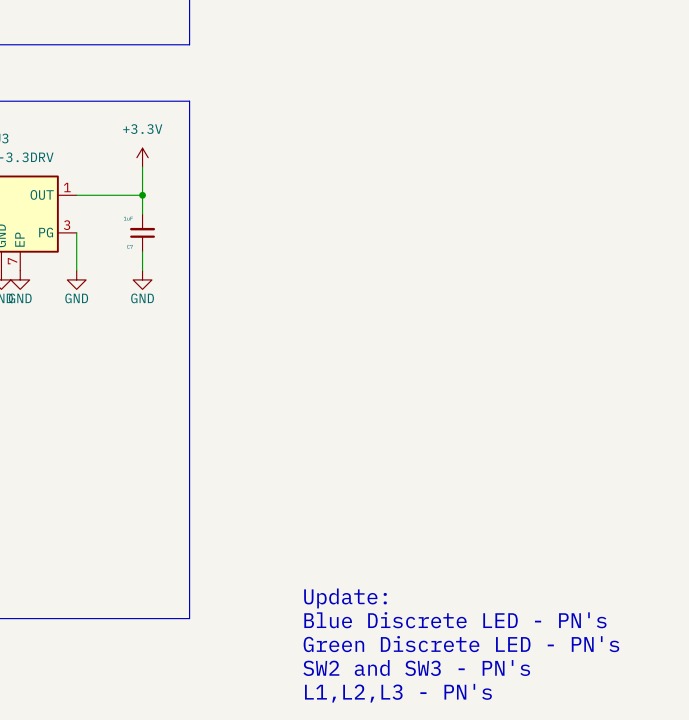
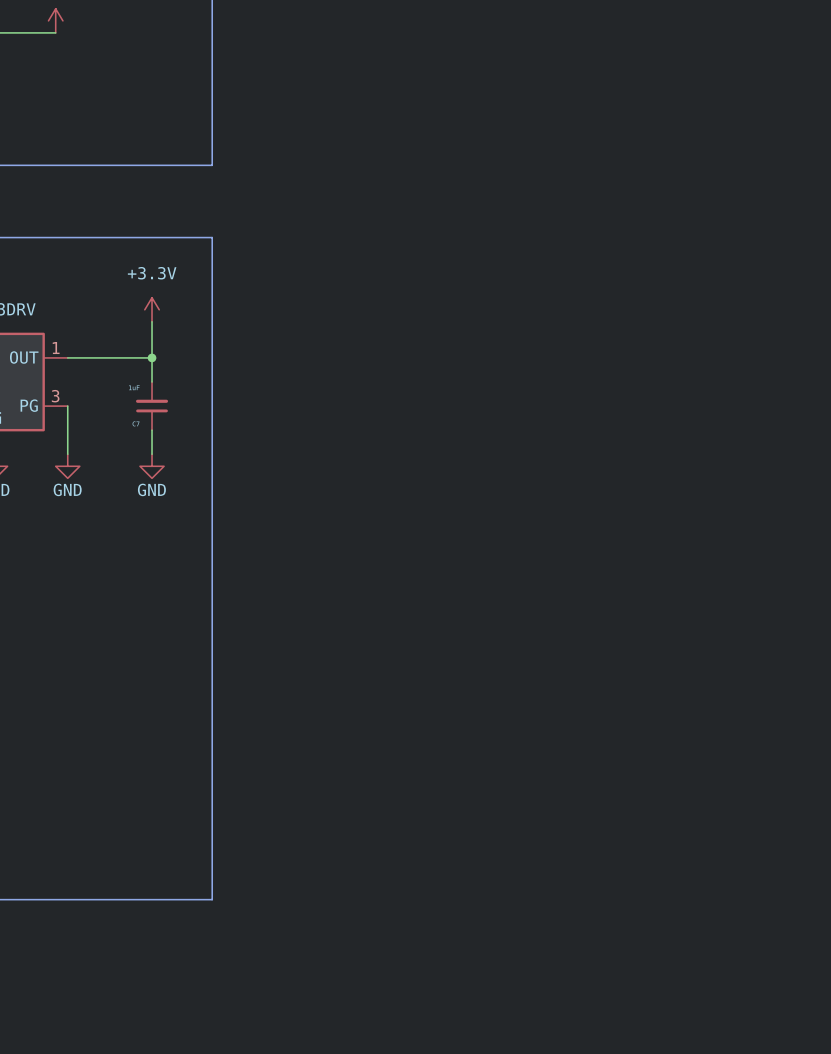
text: Update: (345, 598) -> none
text: Blue Discrete LED - PN's (455, 620) -> none
text: Green Discrete LED - PN's (461, 644) -> none
text: SW2 and SW3 - PN's (416, 668) -> none
text: L1,L2,L3 - PN's (398, 693) -> none

